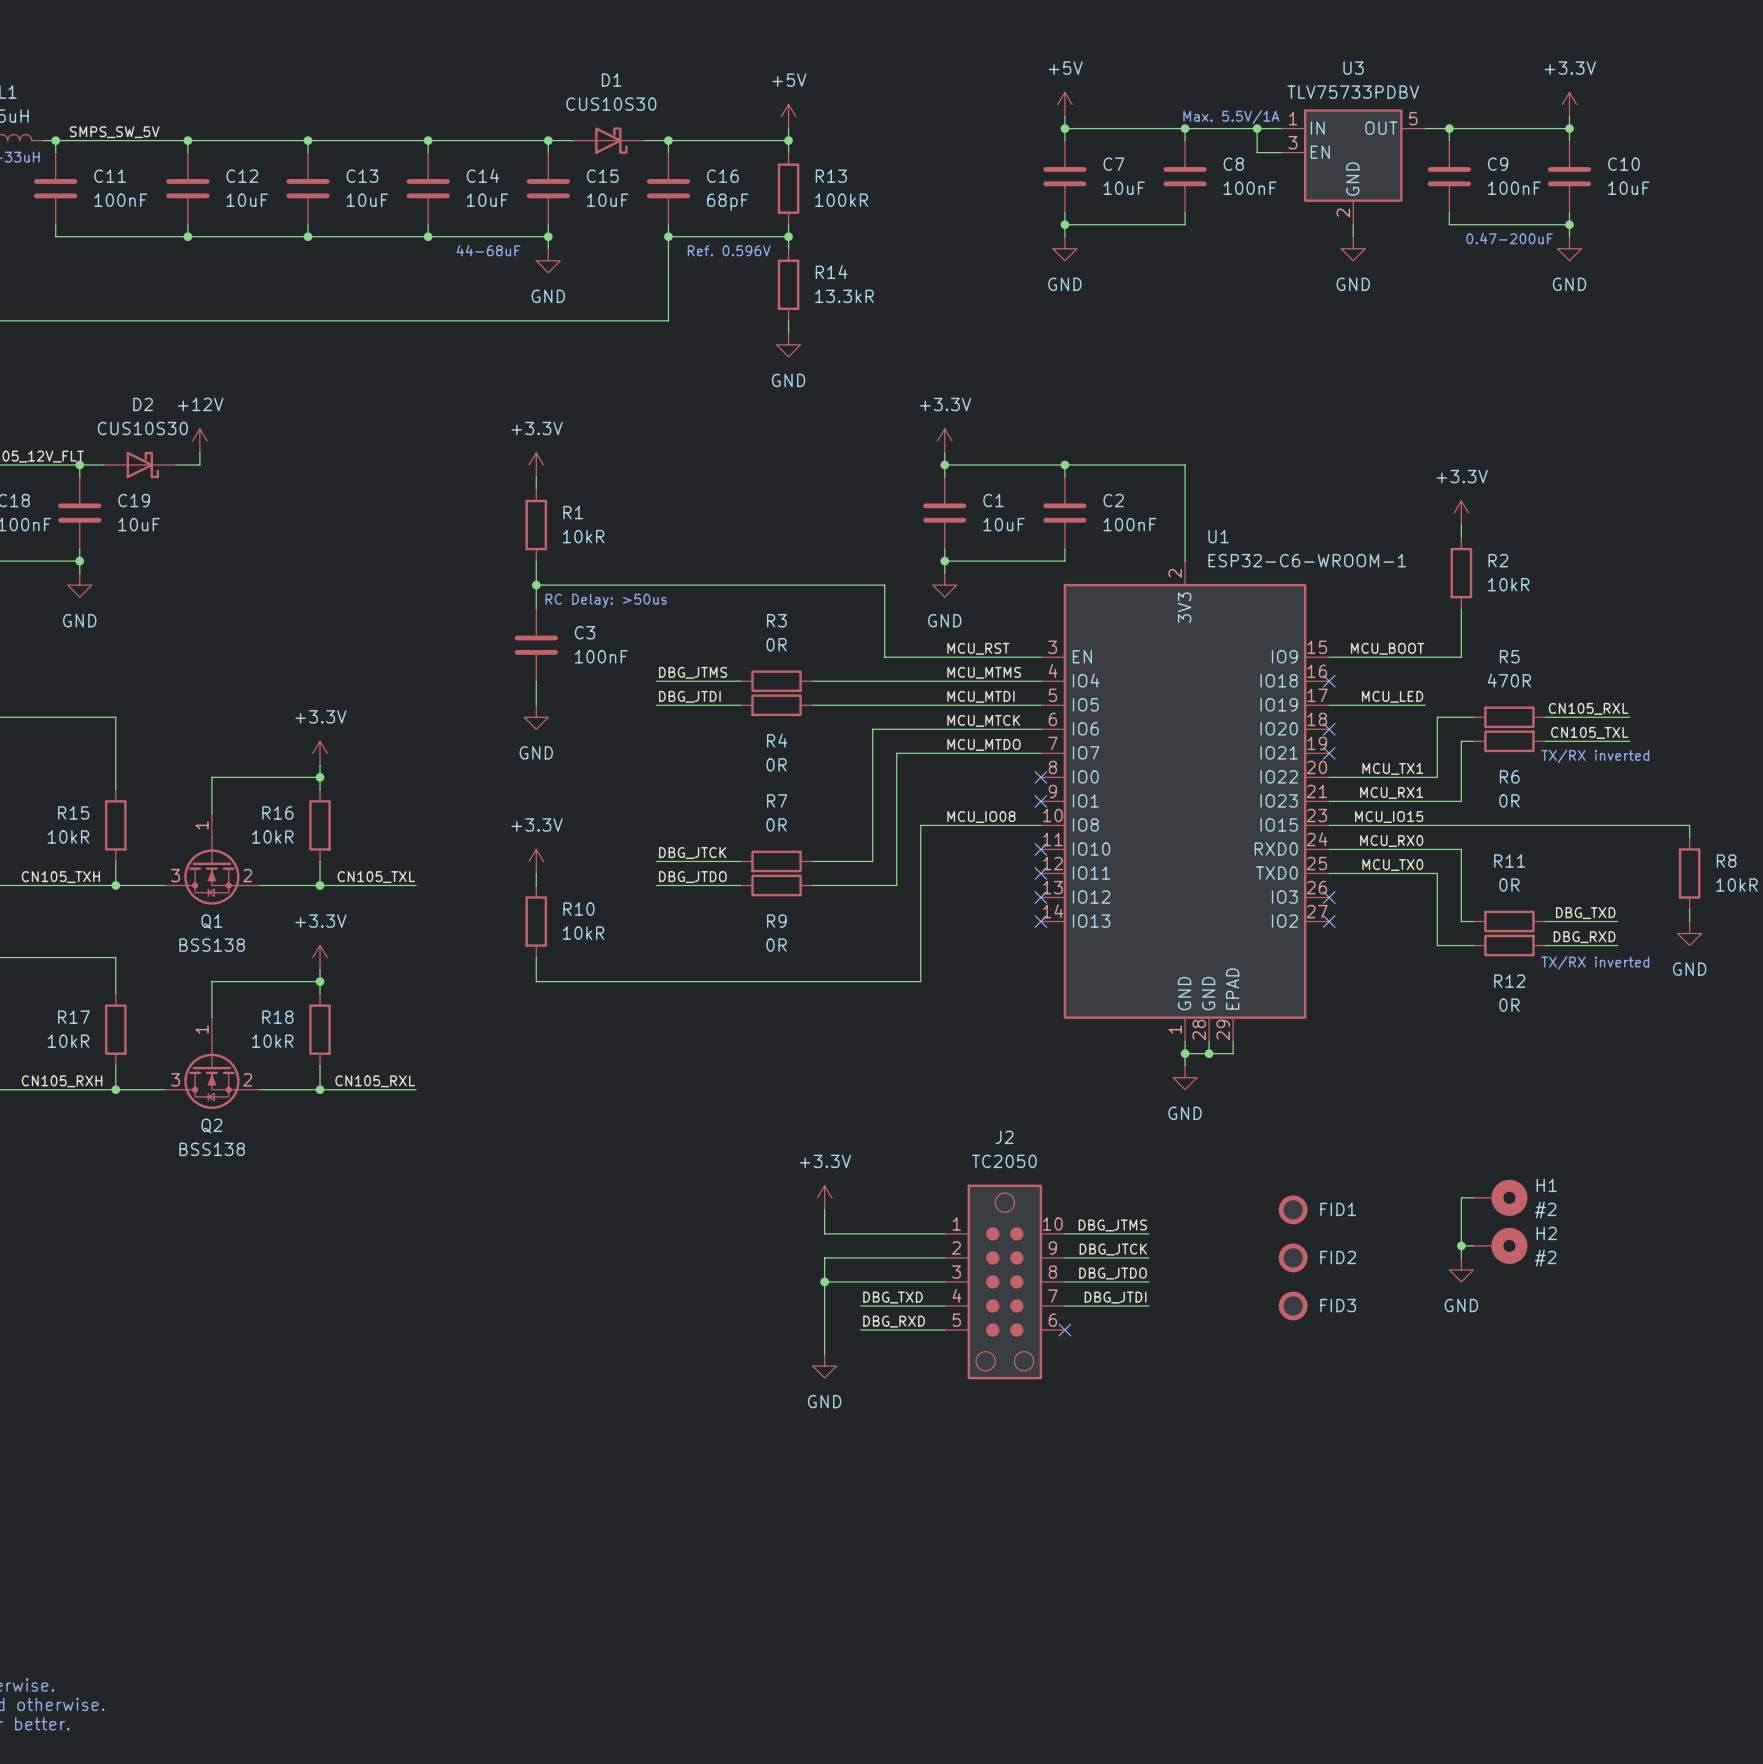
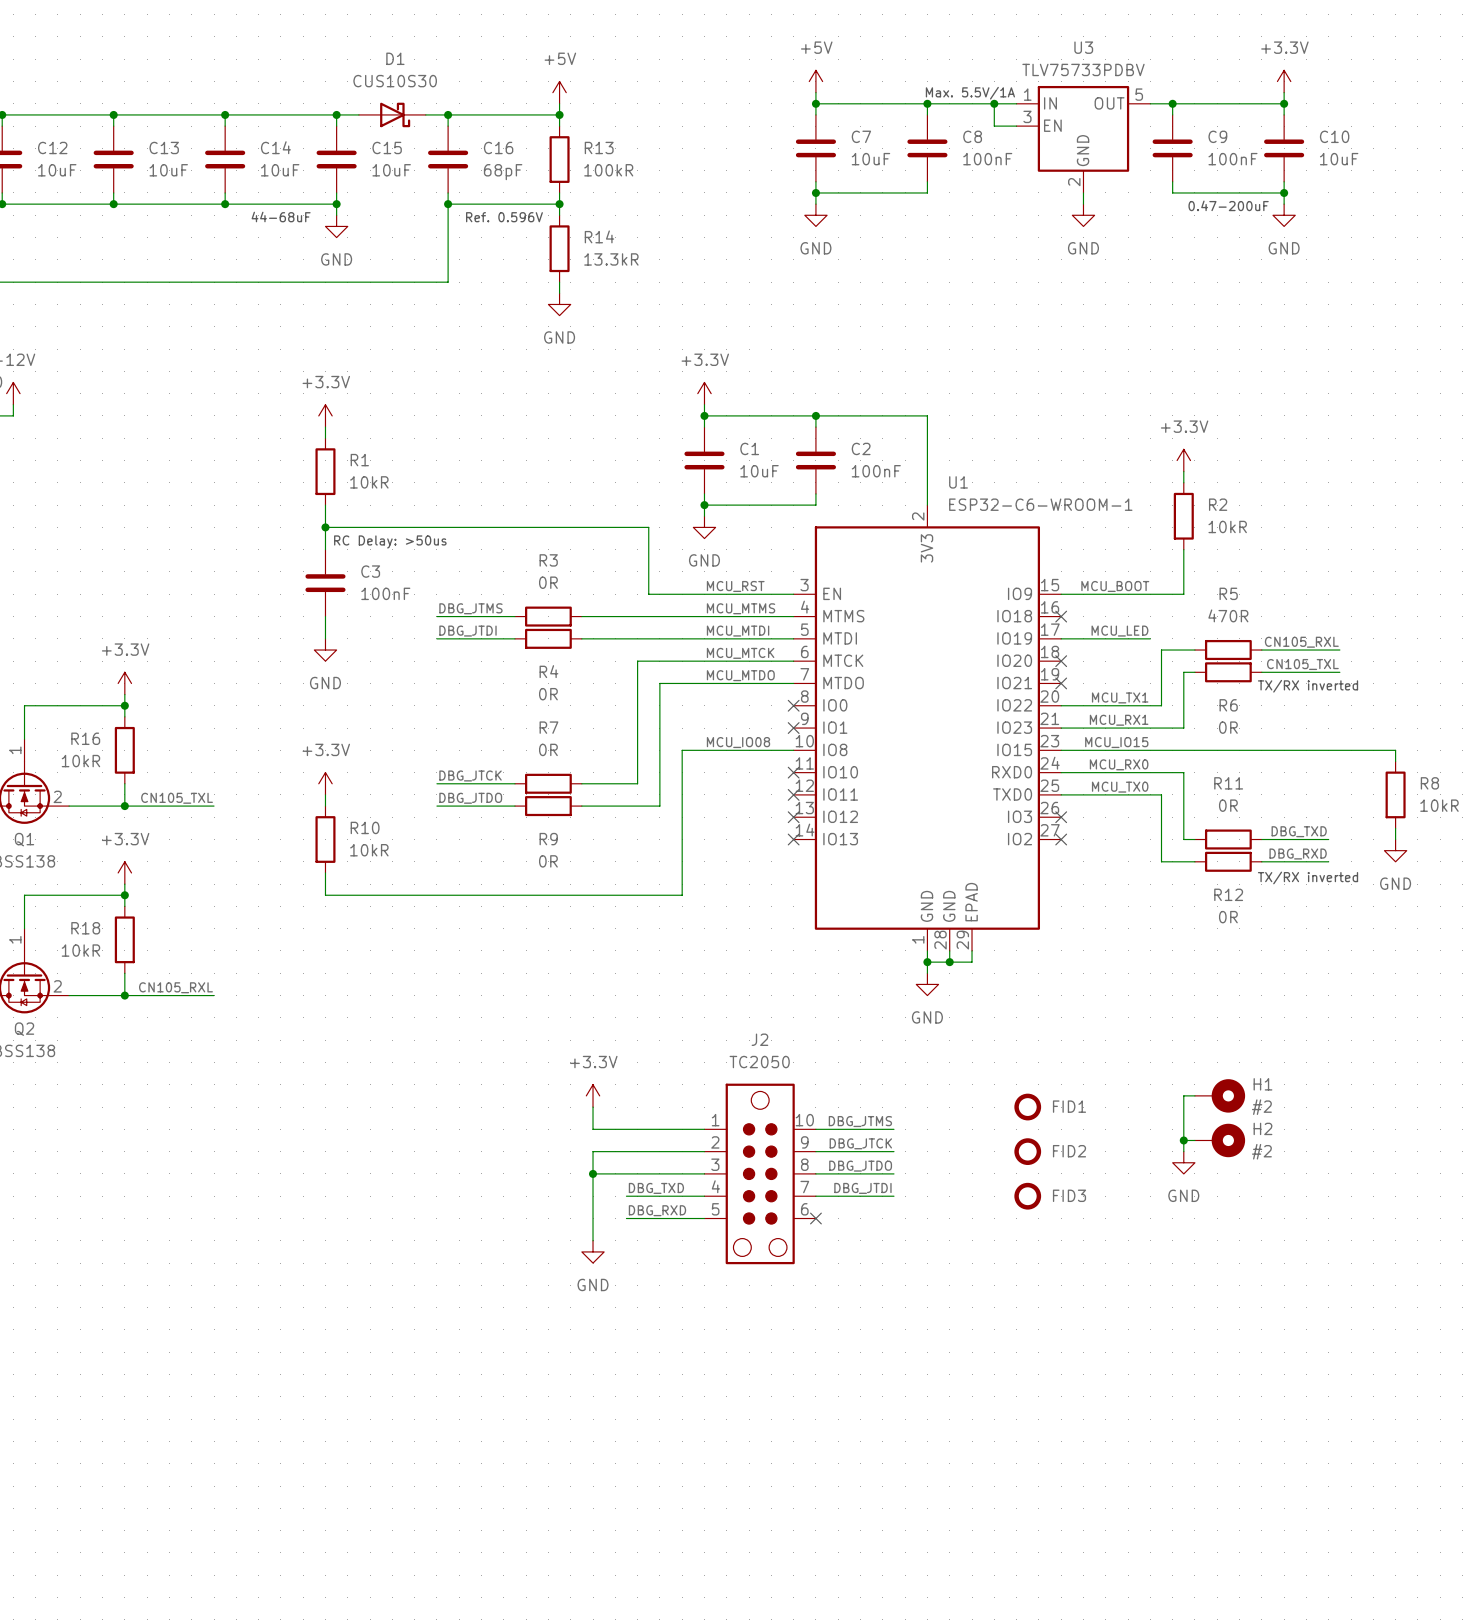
U1 pin name: IO4 (1086, 680) -> MTMS (843, 616)
U1 pin name: IO5 (1085, 704) -> MTDI (840, 638)
U1 pin name: IO6 (1085, 728) -> MTCK (843, 660)
U1 pin name: IO7 (1086, 752) -> MTDO (843, 683)

